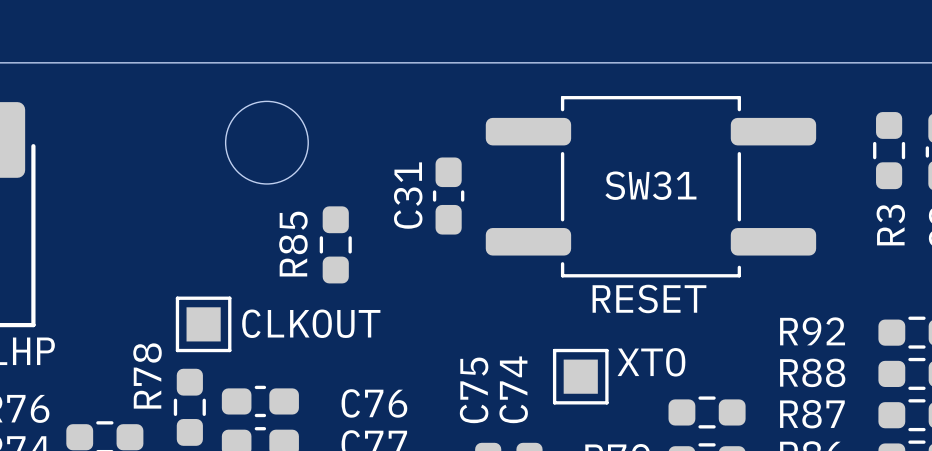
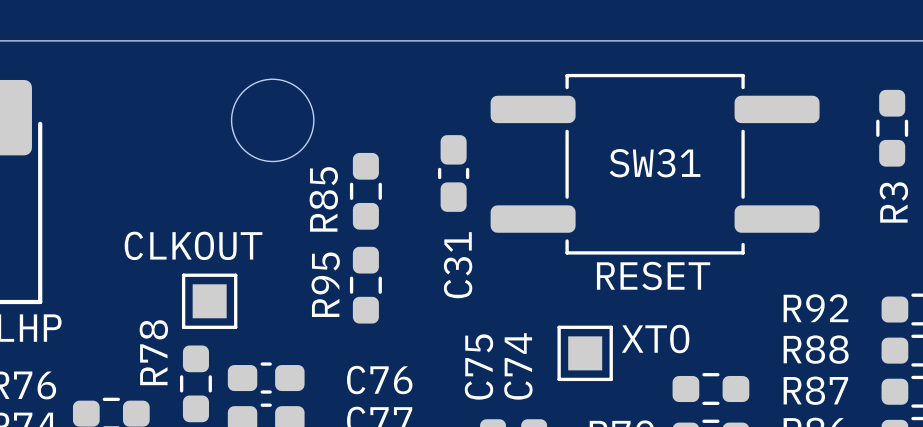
C31 name position: C31 (408, 195) -> C31 (458, 265)
R85 name position: R85 (293, 244) -> R85 (323, 199)
R85 position: (335, 244) -> (365, 191)
R95: none -> (365, 285)
text position: CLKOUT (311, 323) -> CLKOUT (193, 245)

